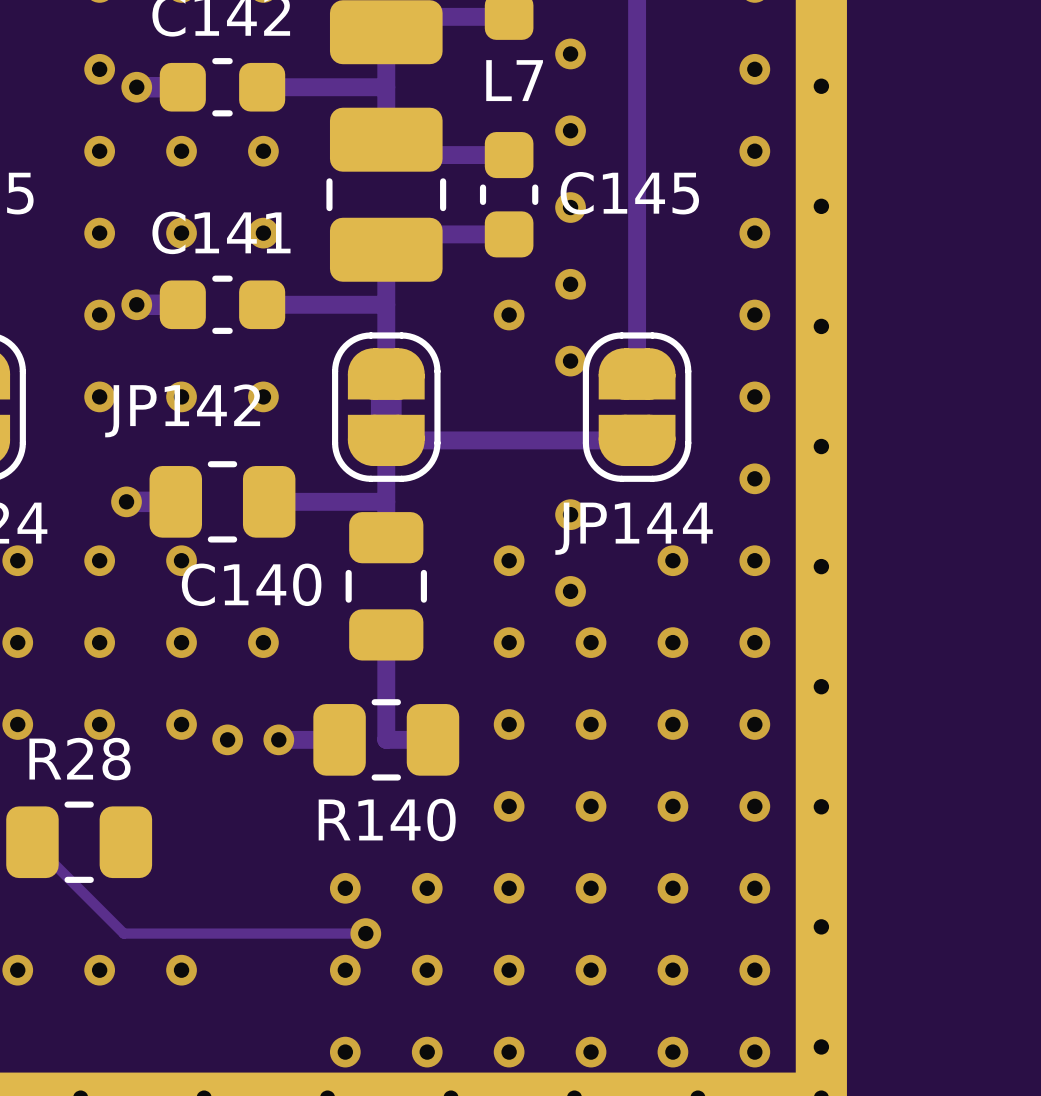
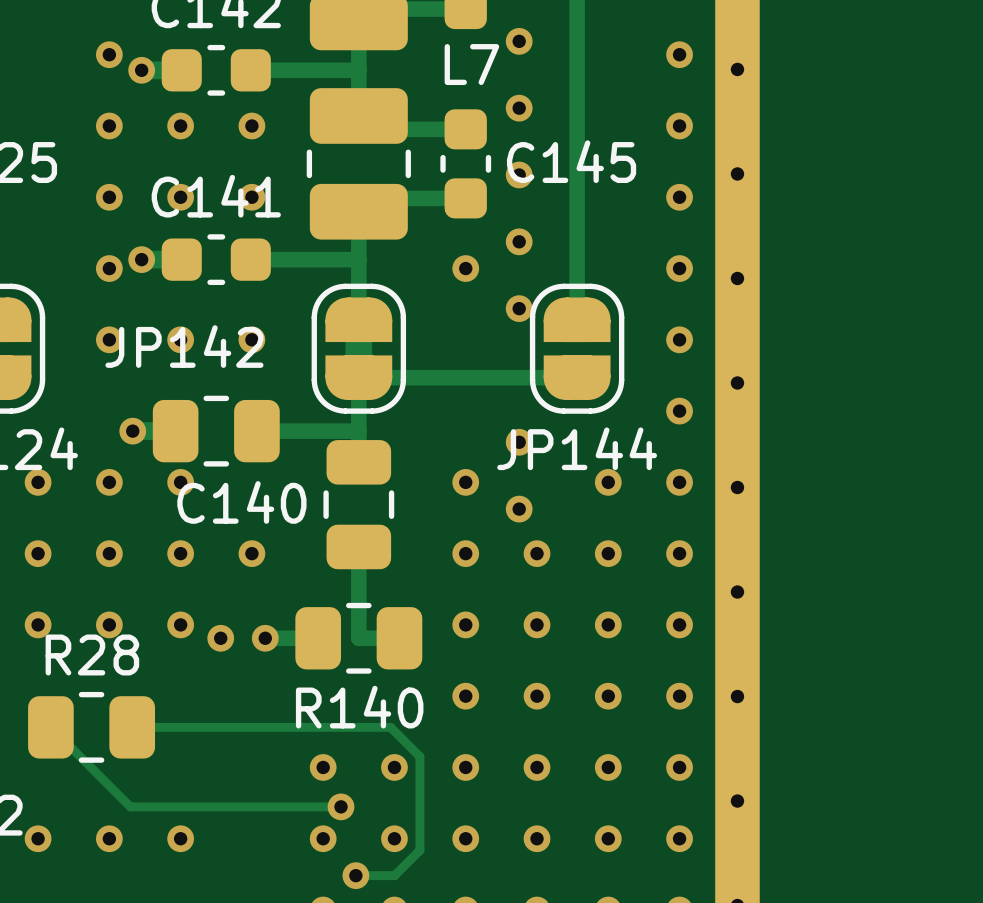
track: none -> (132, 727) (390, 727) (419, 756) (419, 850) (394, 875) (355, 875)
via: none -> (355, 875)

